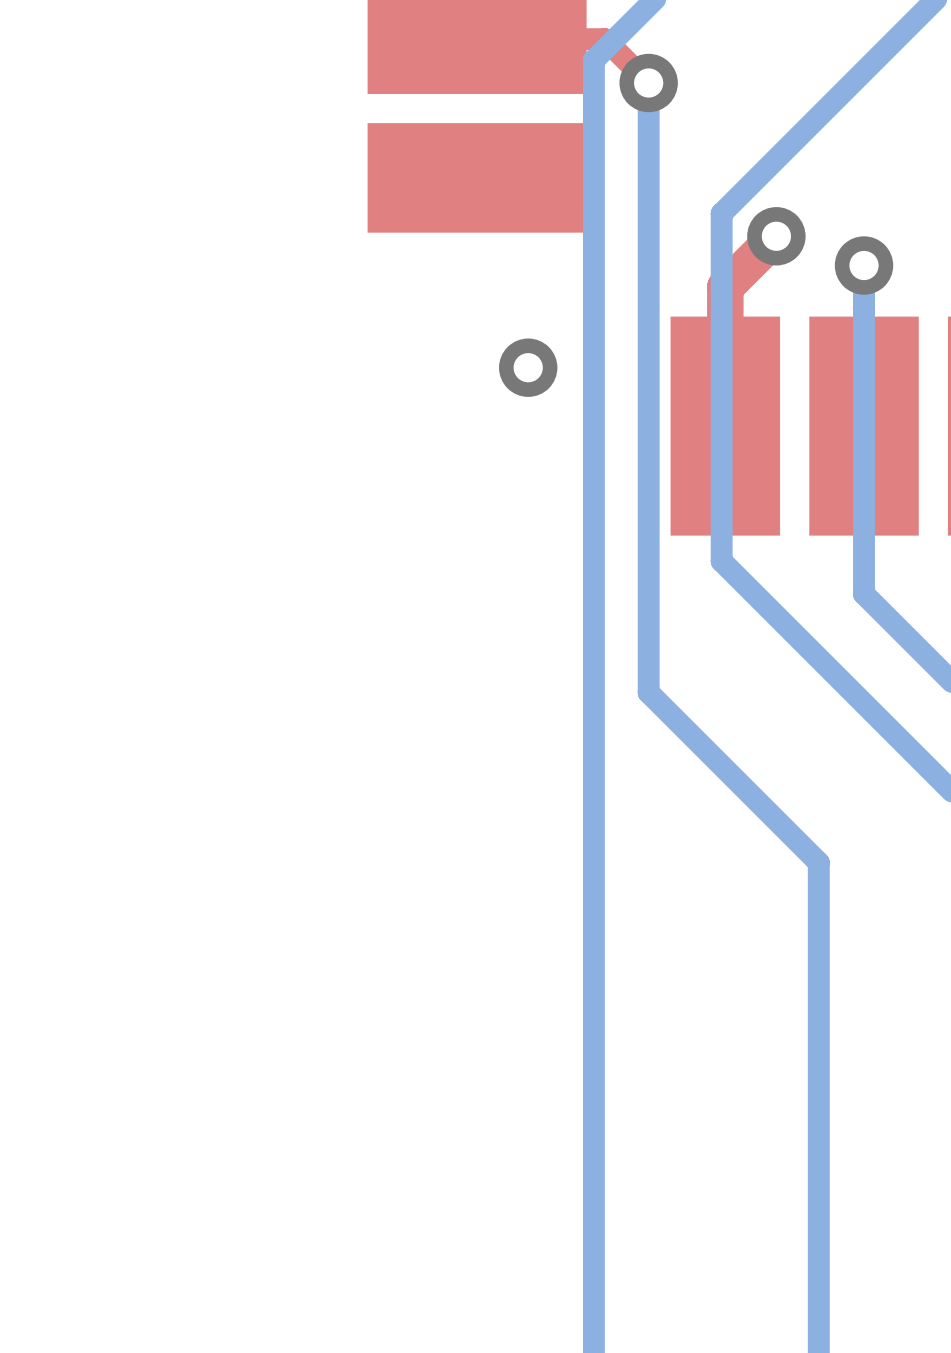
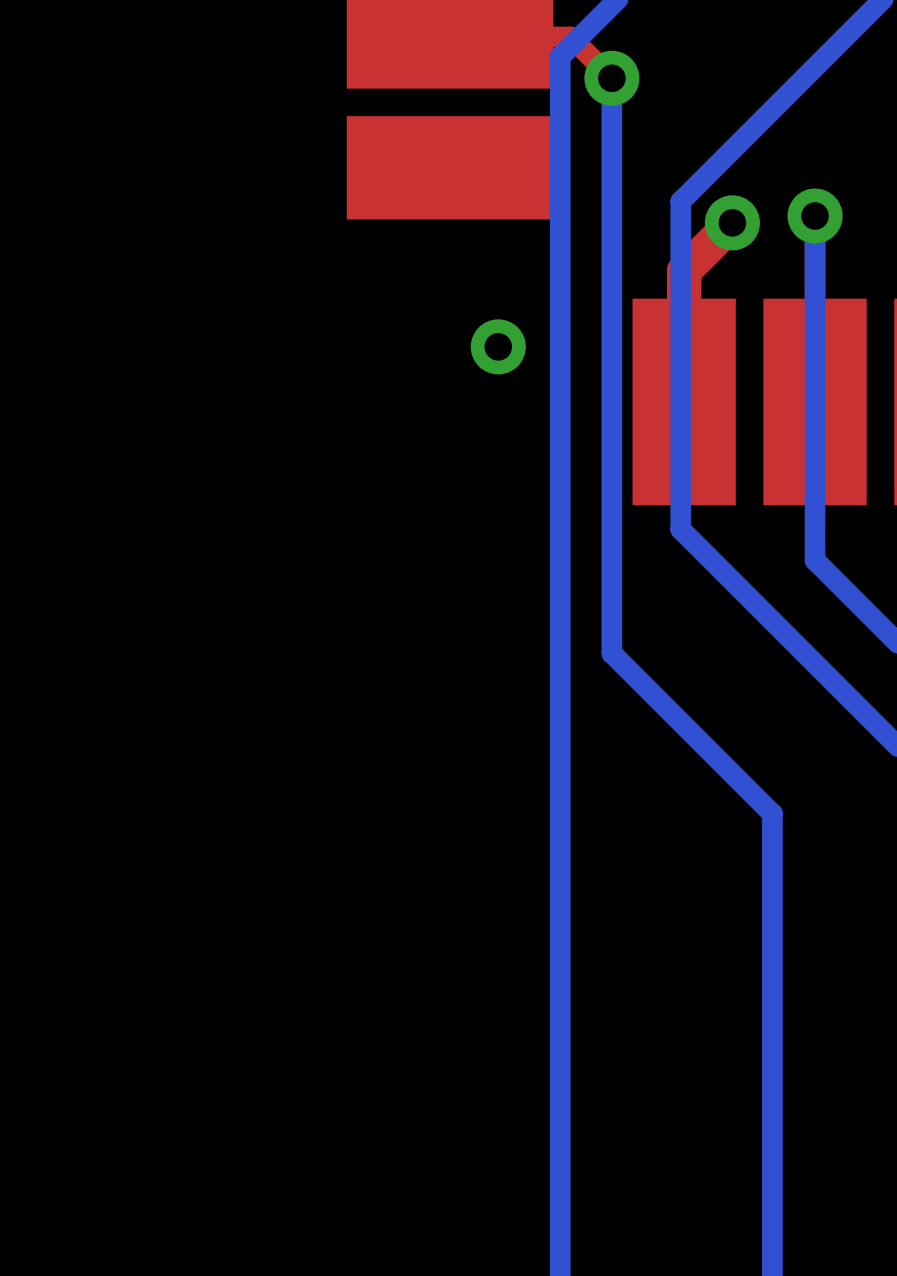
via position: (864, 265) -> (815, 216)

